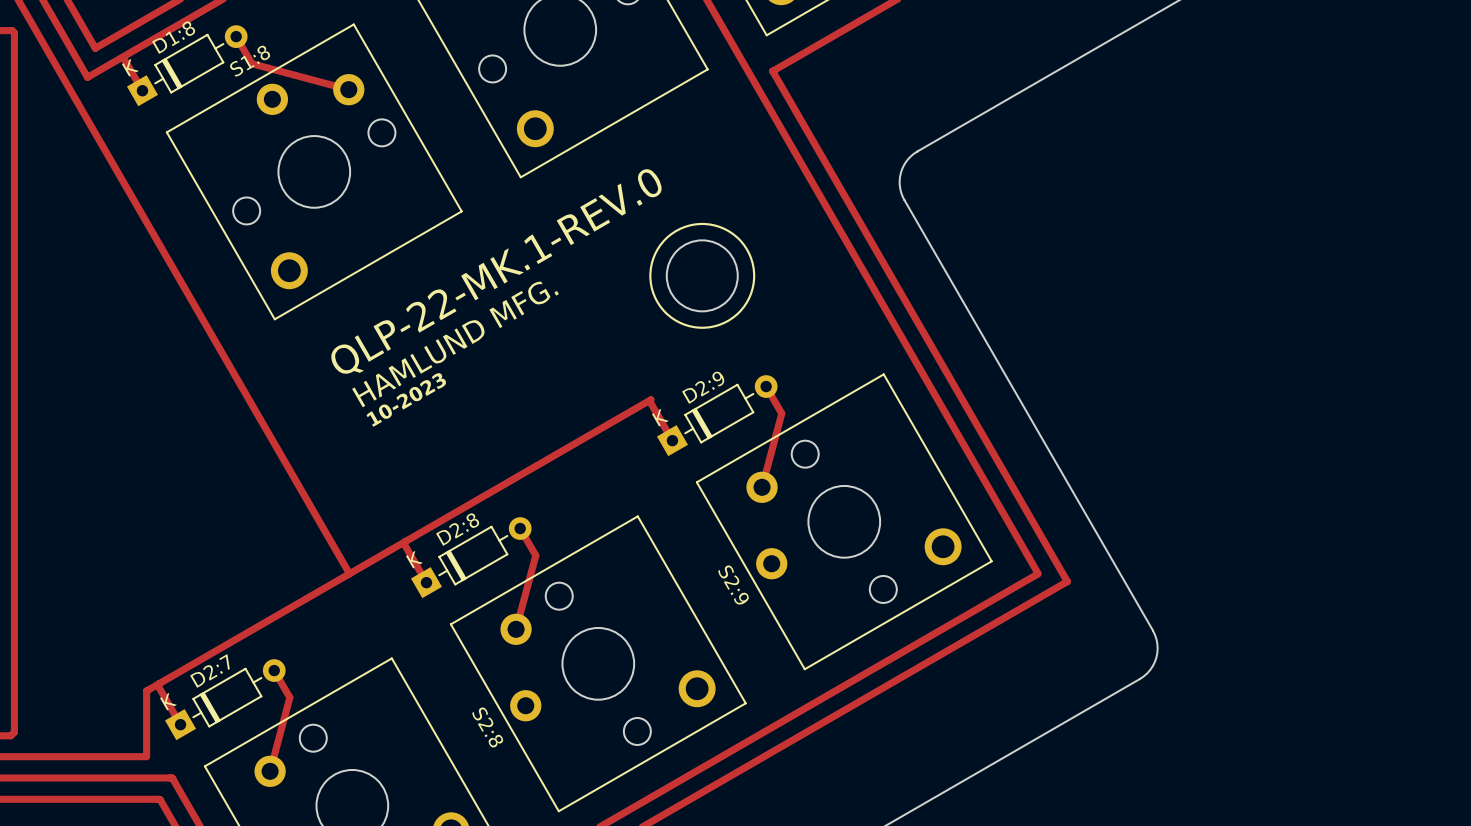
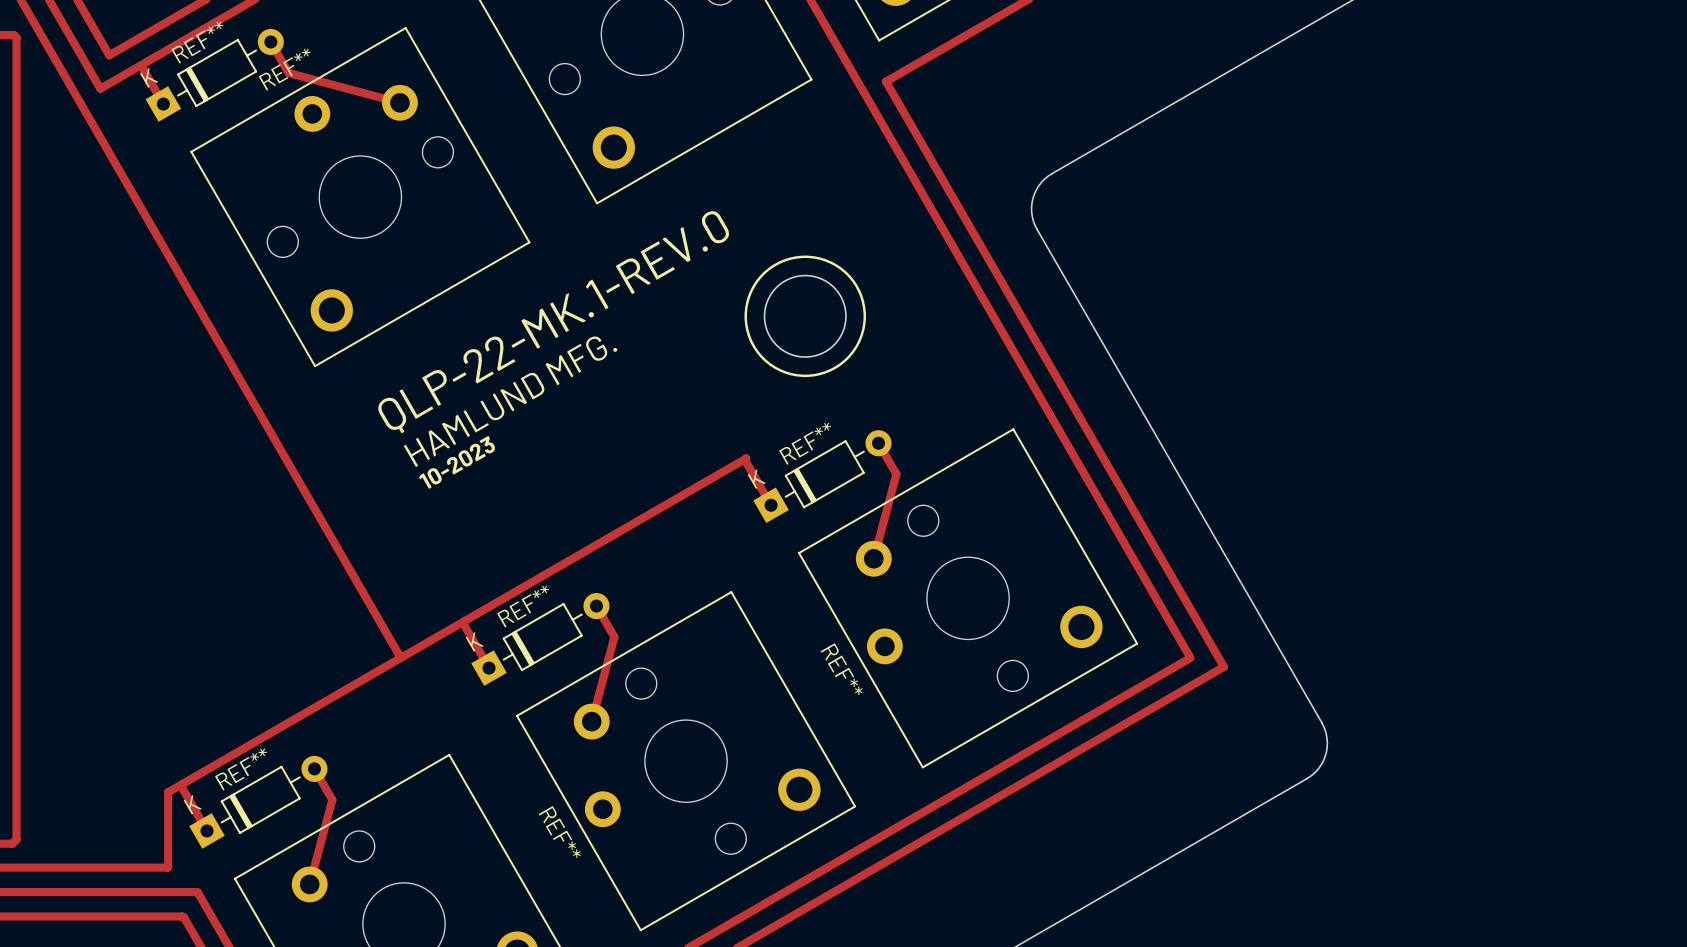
REF** name: D1:8 (173, 37) -> REF** (197, 42)
REF** name: S1:8 (250, 61) -> REF** (284, 69)
REF** name: D2:9 (703, 387) -> REF** (804, 443)
REF** name: D2:8 (457, 529) -> REF** (522, 606)
REF** name: S2:9 (733, 584) -> REF** (841, 669)
REF** name: D2:7 (209, 671) -> REF** (240, 769)
REF** name: S2:8 (487, 727) -> REF** (559, 831)

